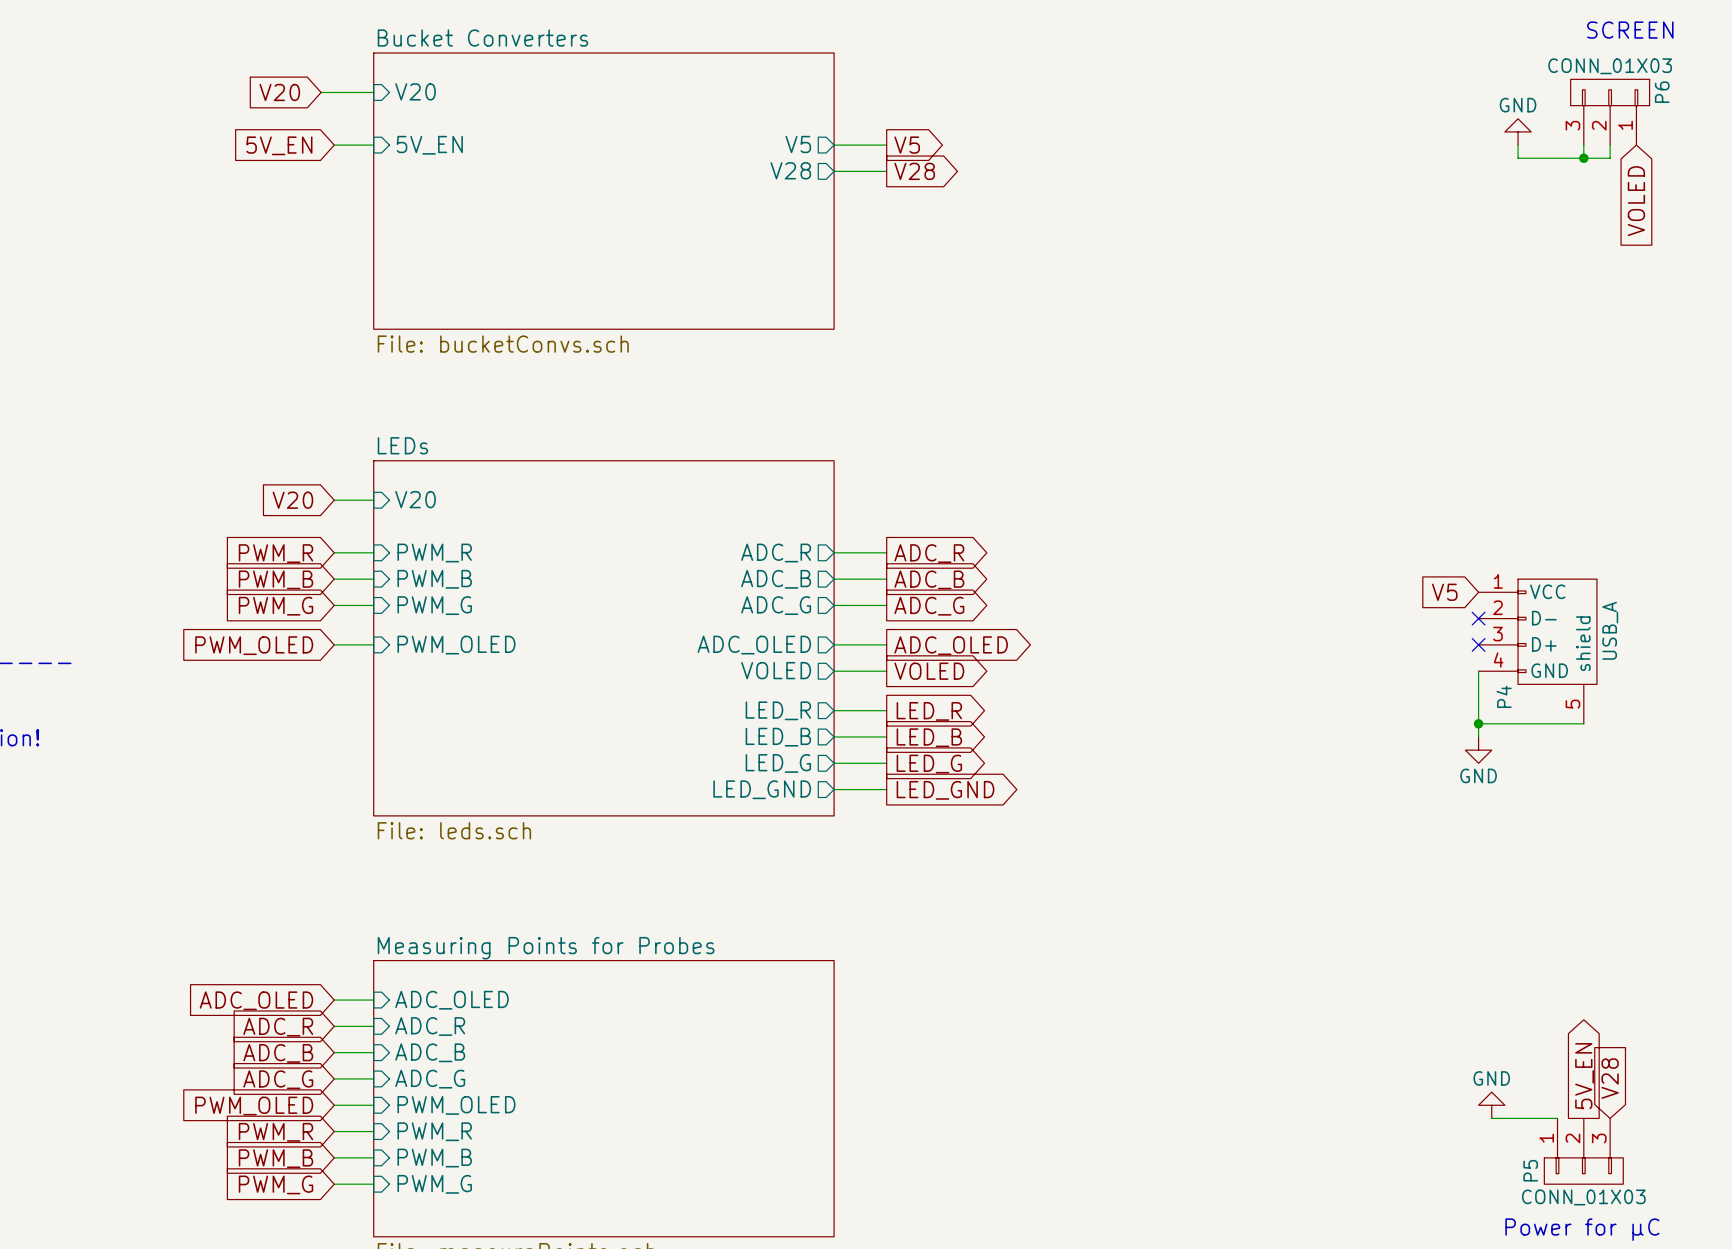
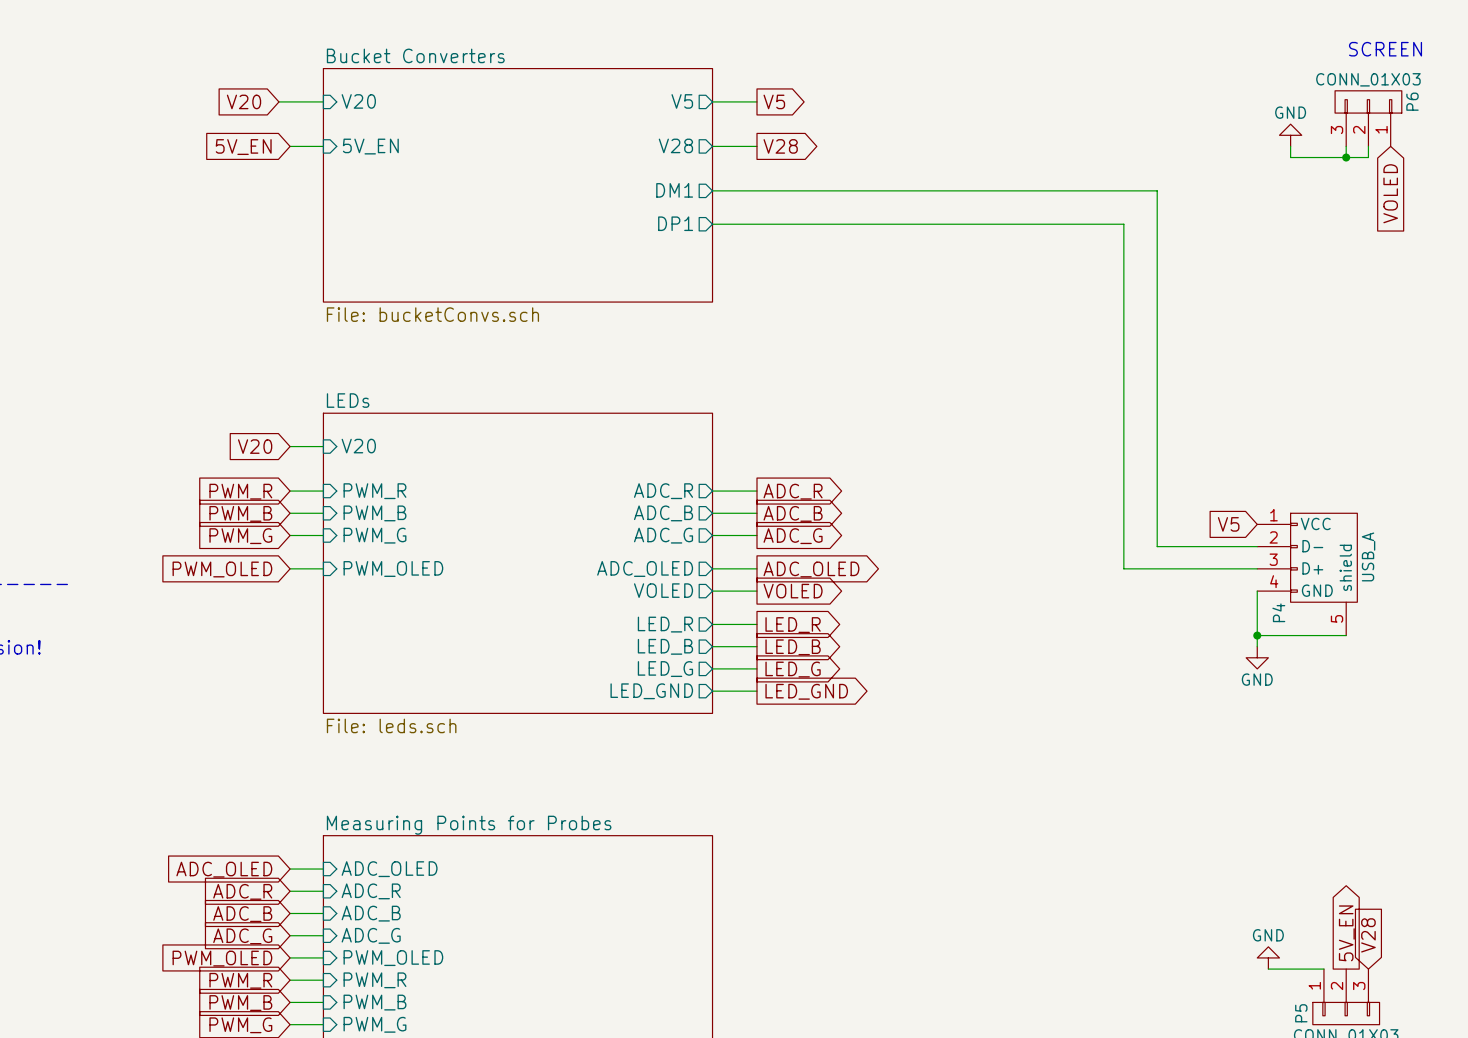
sheet pin: none -> V5 (682, 101)
global label: none -> V5 (774, 101)
sheet pin: V5 (798, 144) -> V28 (675, 145)
global label: V5 (907, 145) -> V28 (780, 146)
sheet pin: V28 (790, 170) -> none
wire: (834, 171) (886, 171) -> (712, 101) (756, 101)
global label: V28 (914, 171) -> none
sheet pin: none -> DM1 (674, 190)
wire: none -> (712, 190) (1157, 190) (1157, 546) (1257, 546)
sheet pin: none -> DP1 (675, 223)
wire: none -> (712, 224) (1123, 224) (1123, 568) (1257, 568)
no-connect mark: (1478, 618) -> none
no-connect mark: (1478, 644) -> none

